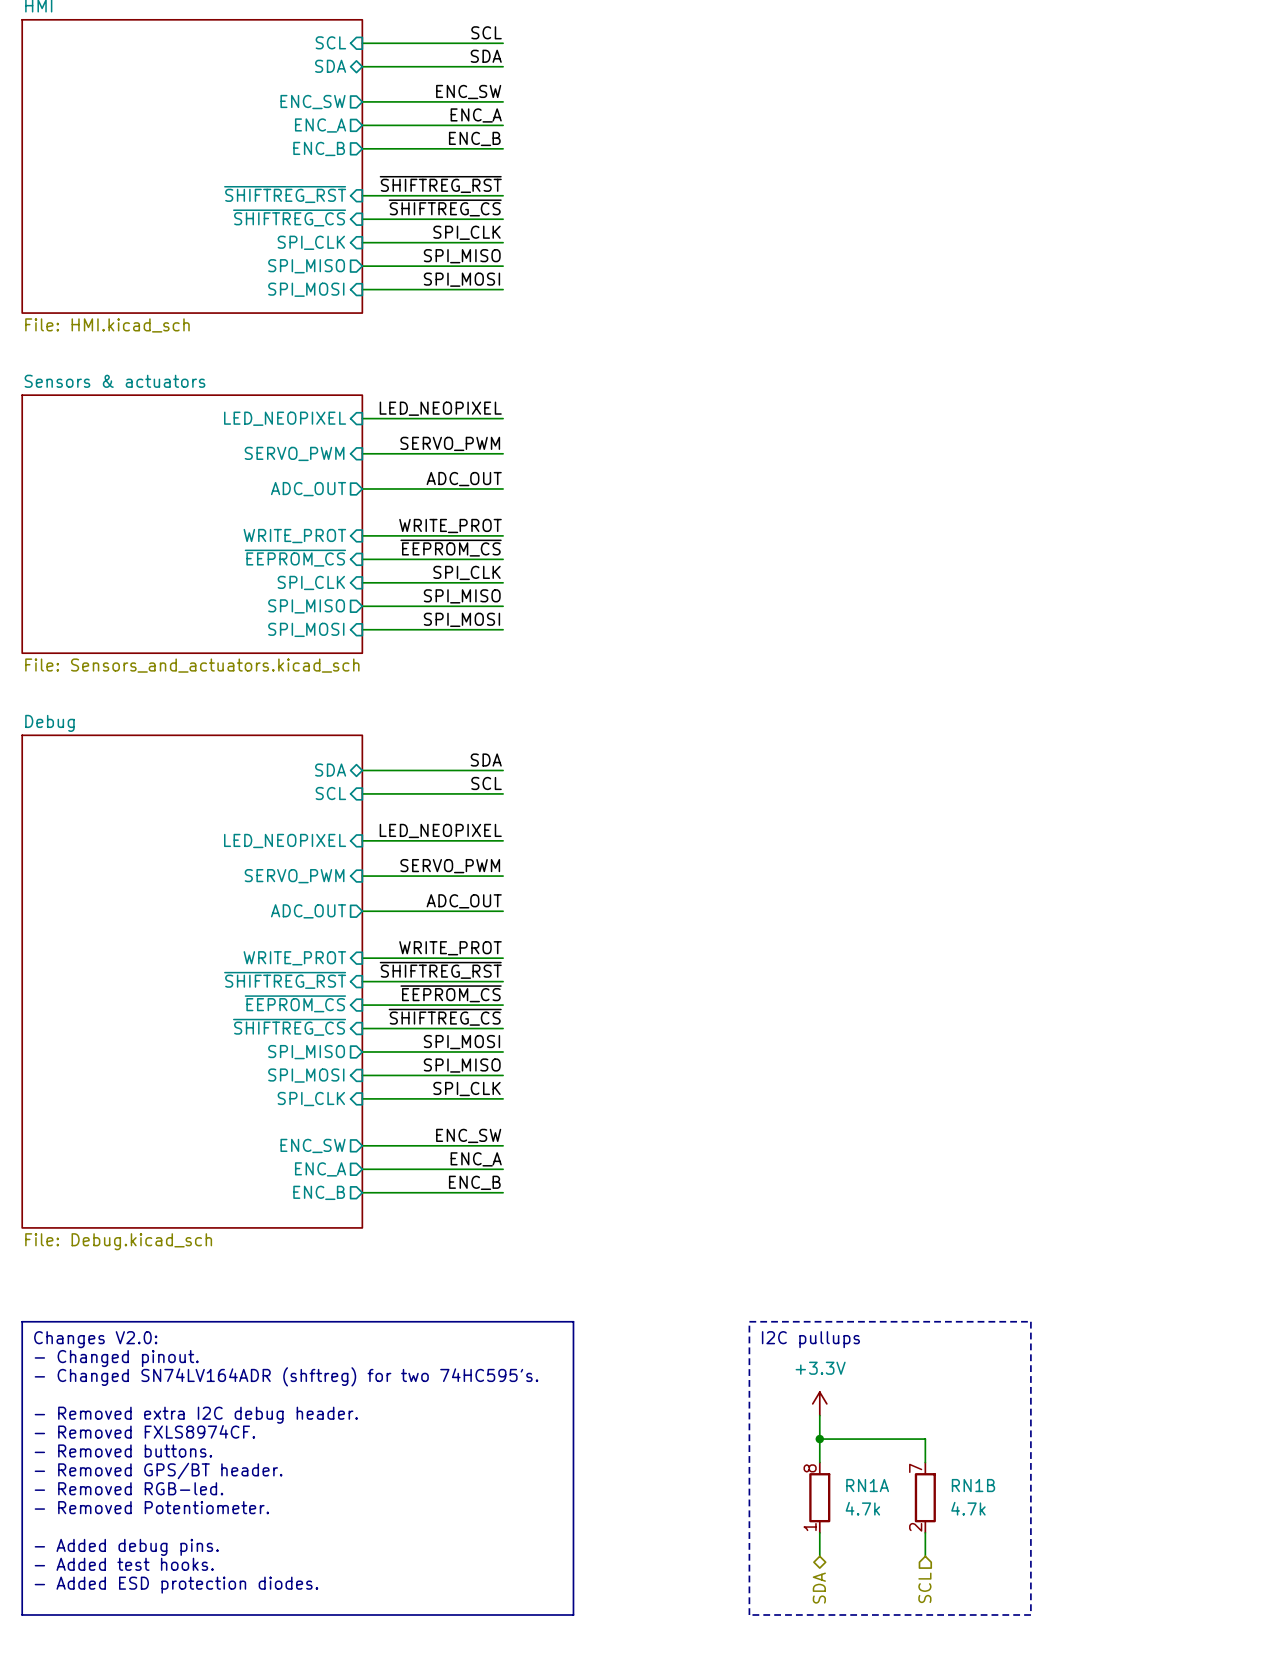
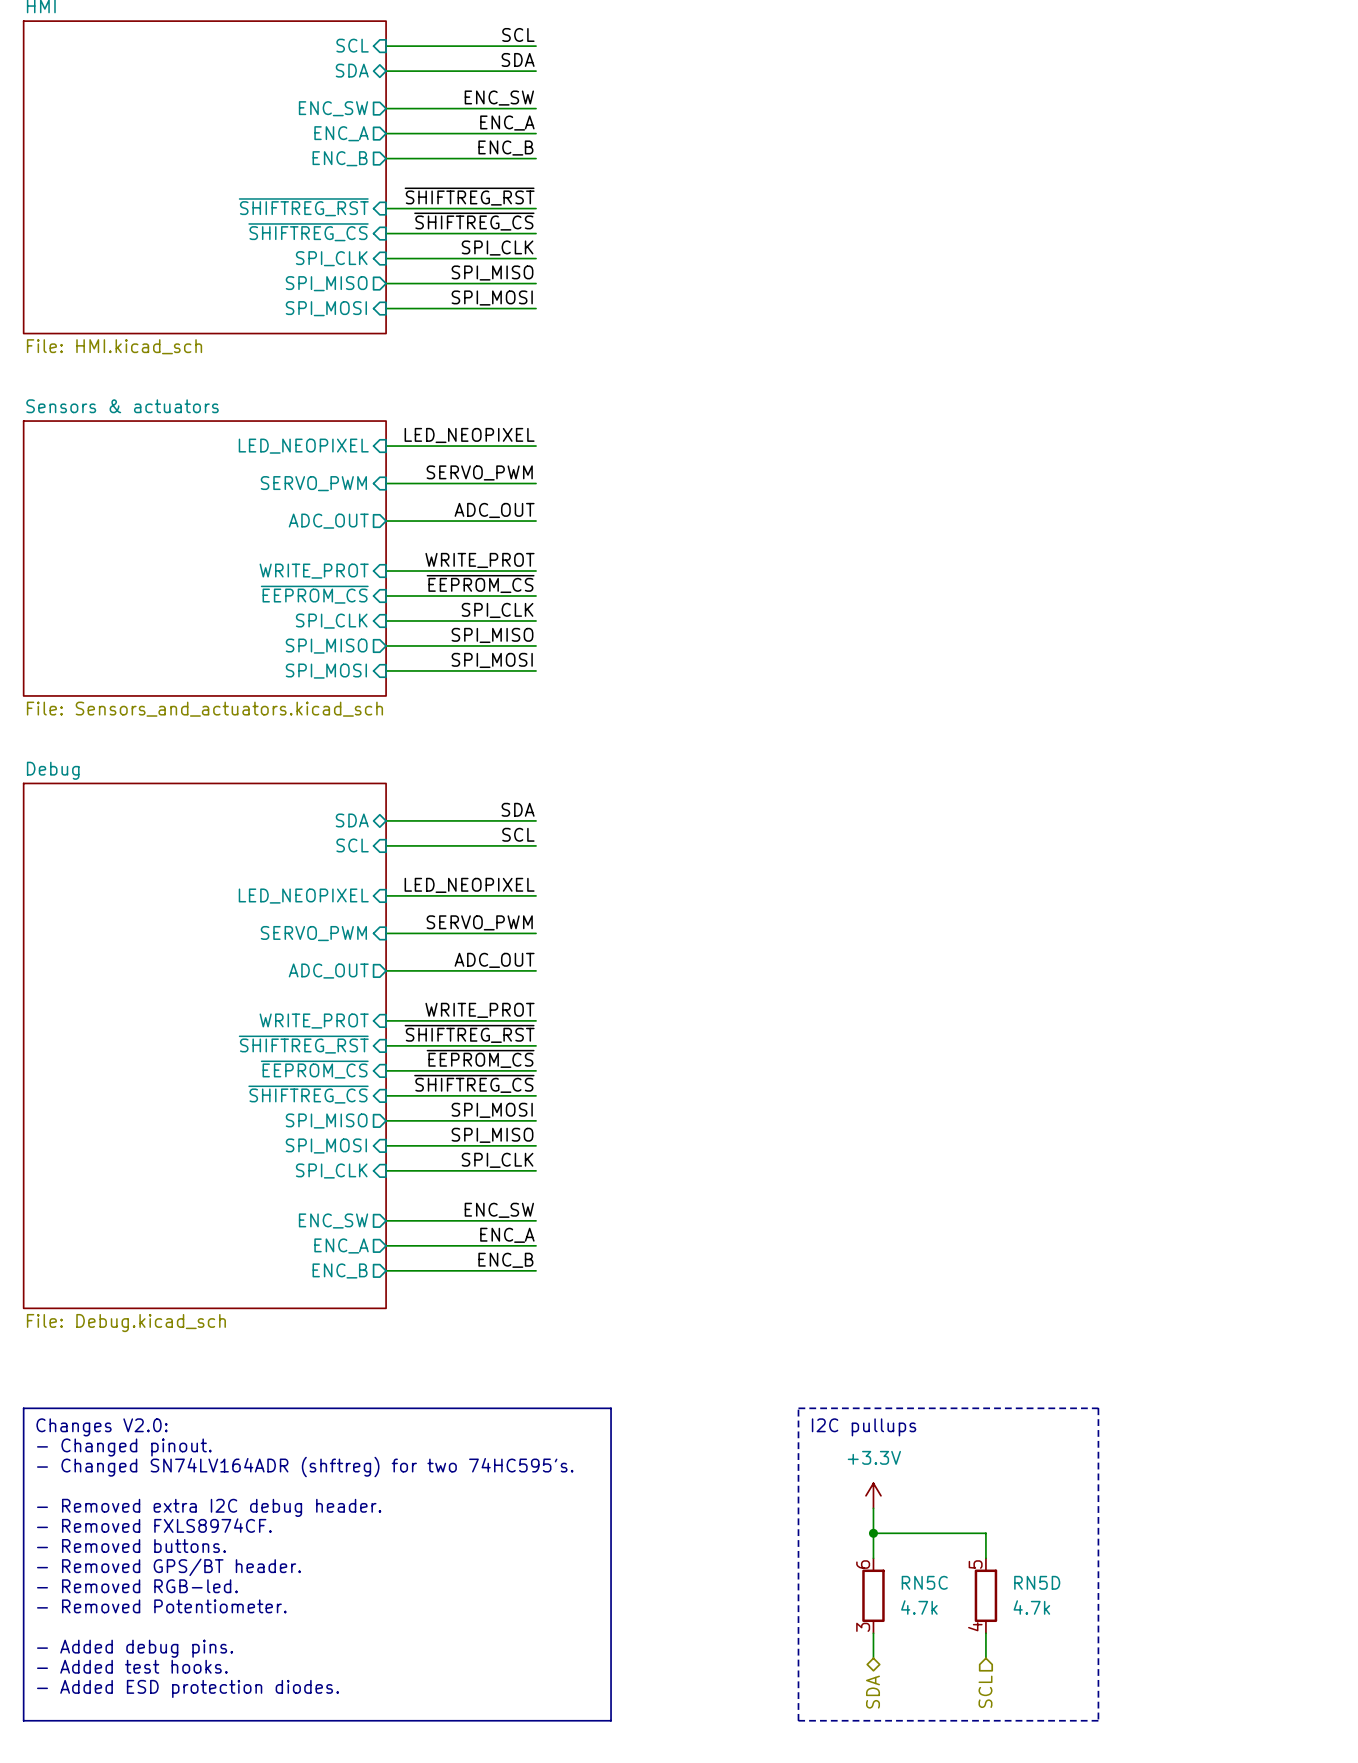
RN1A pin number: 8 (810, 1468) -> 6 (863, 1564)
RN1B pin number: 7 (915, 1468) -> 5 (975, 1564)
RN1A name: RN1A (867, 1485) -> RN5C (924, 1582)
RN1B name: RN1B (973, 1485) -> RN5D (1037, 1582)
RN1A pin number: 1 (810, 1527) -> 3 (863, 1627)
RN1B pin number: 2 (915, 1527) -> 4 (975, 1626)

